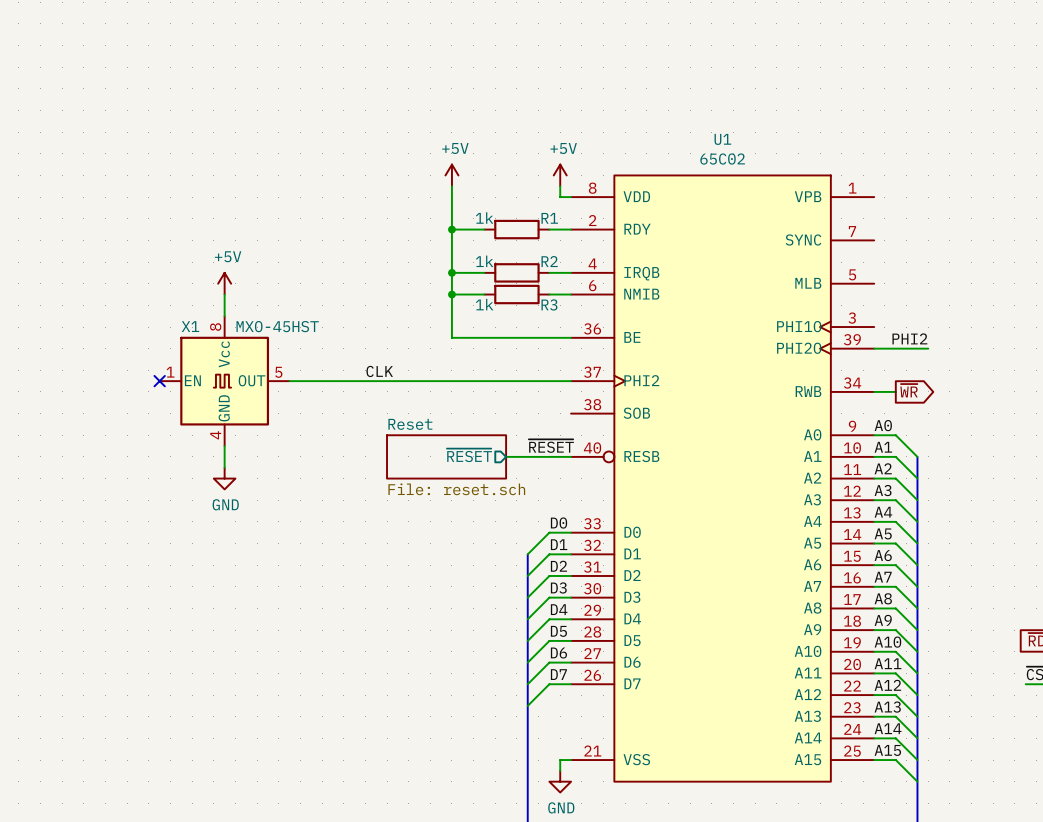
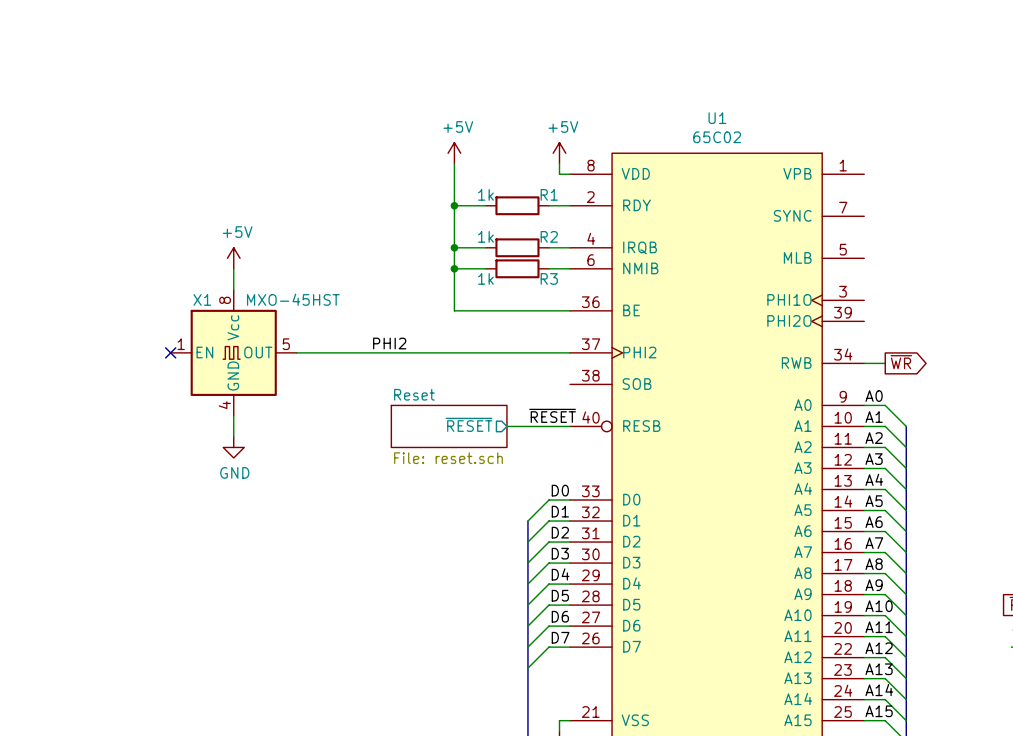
label: PHI2 (909, 338) -> none
wire: (874, 348) (928, 348) -> none
label: CLK (379, 371) -> PHI2 (389, 343)

